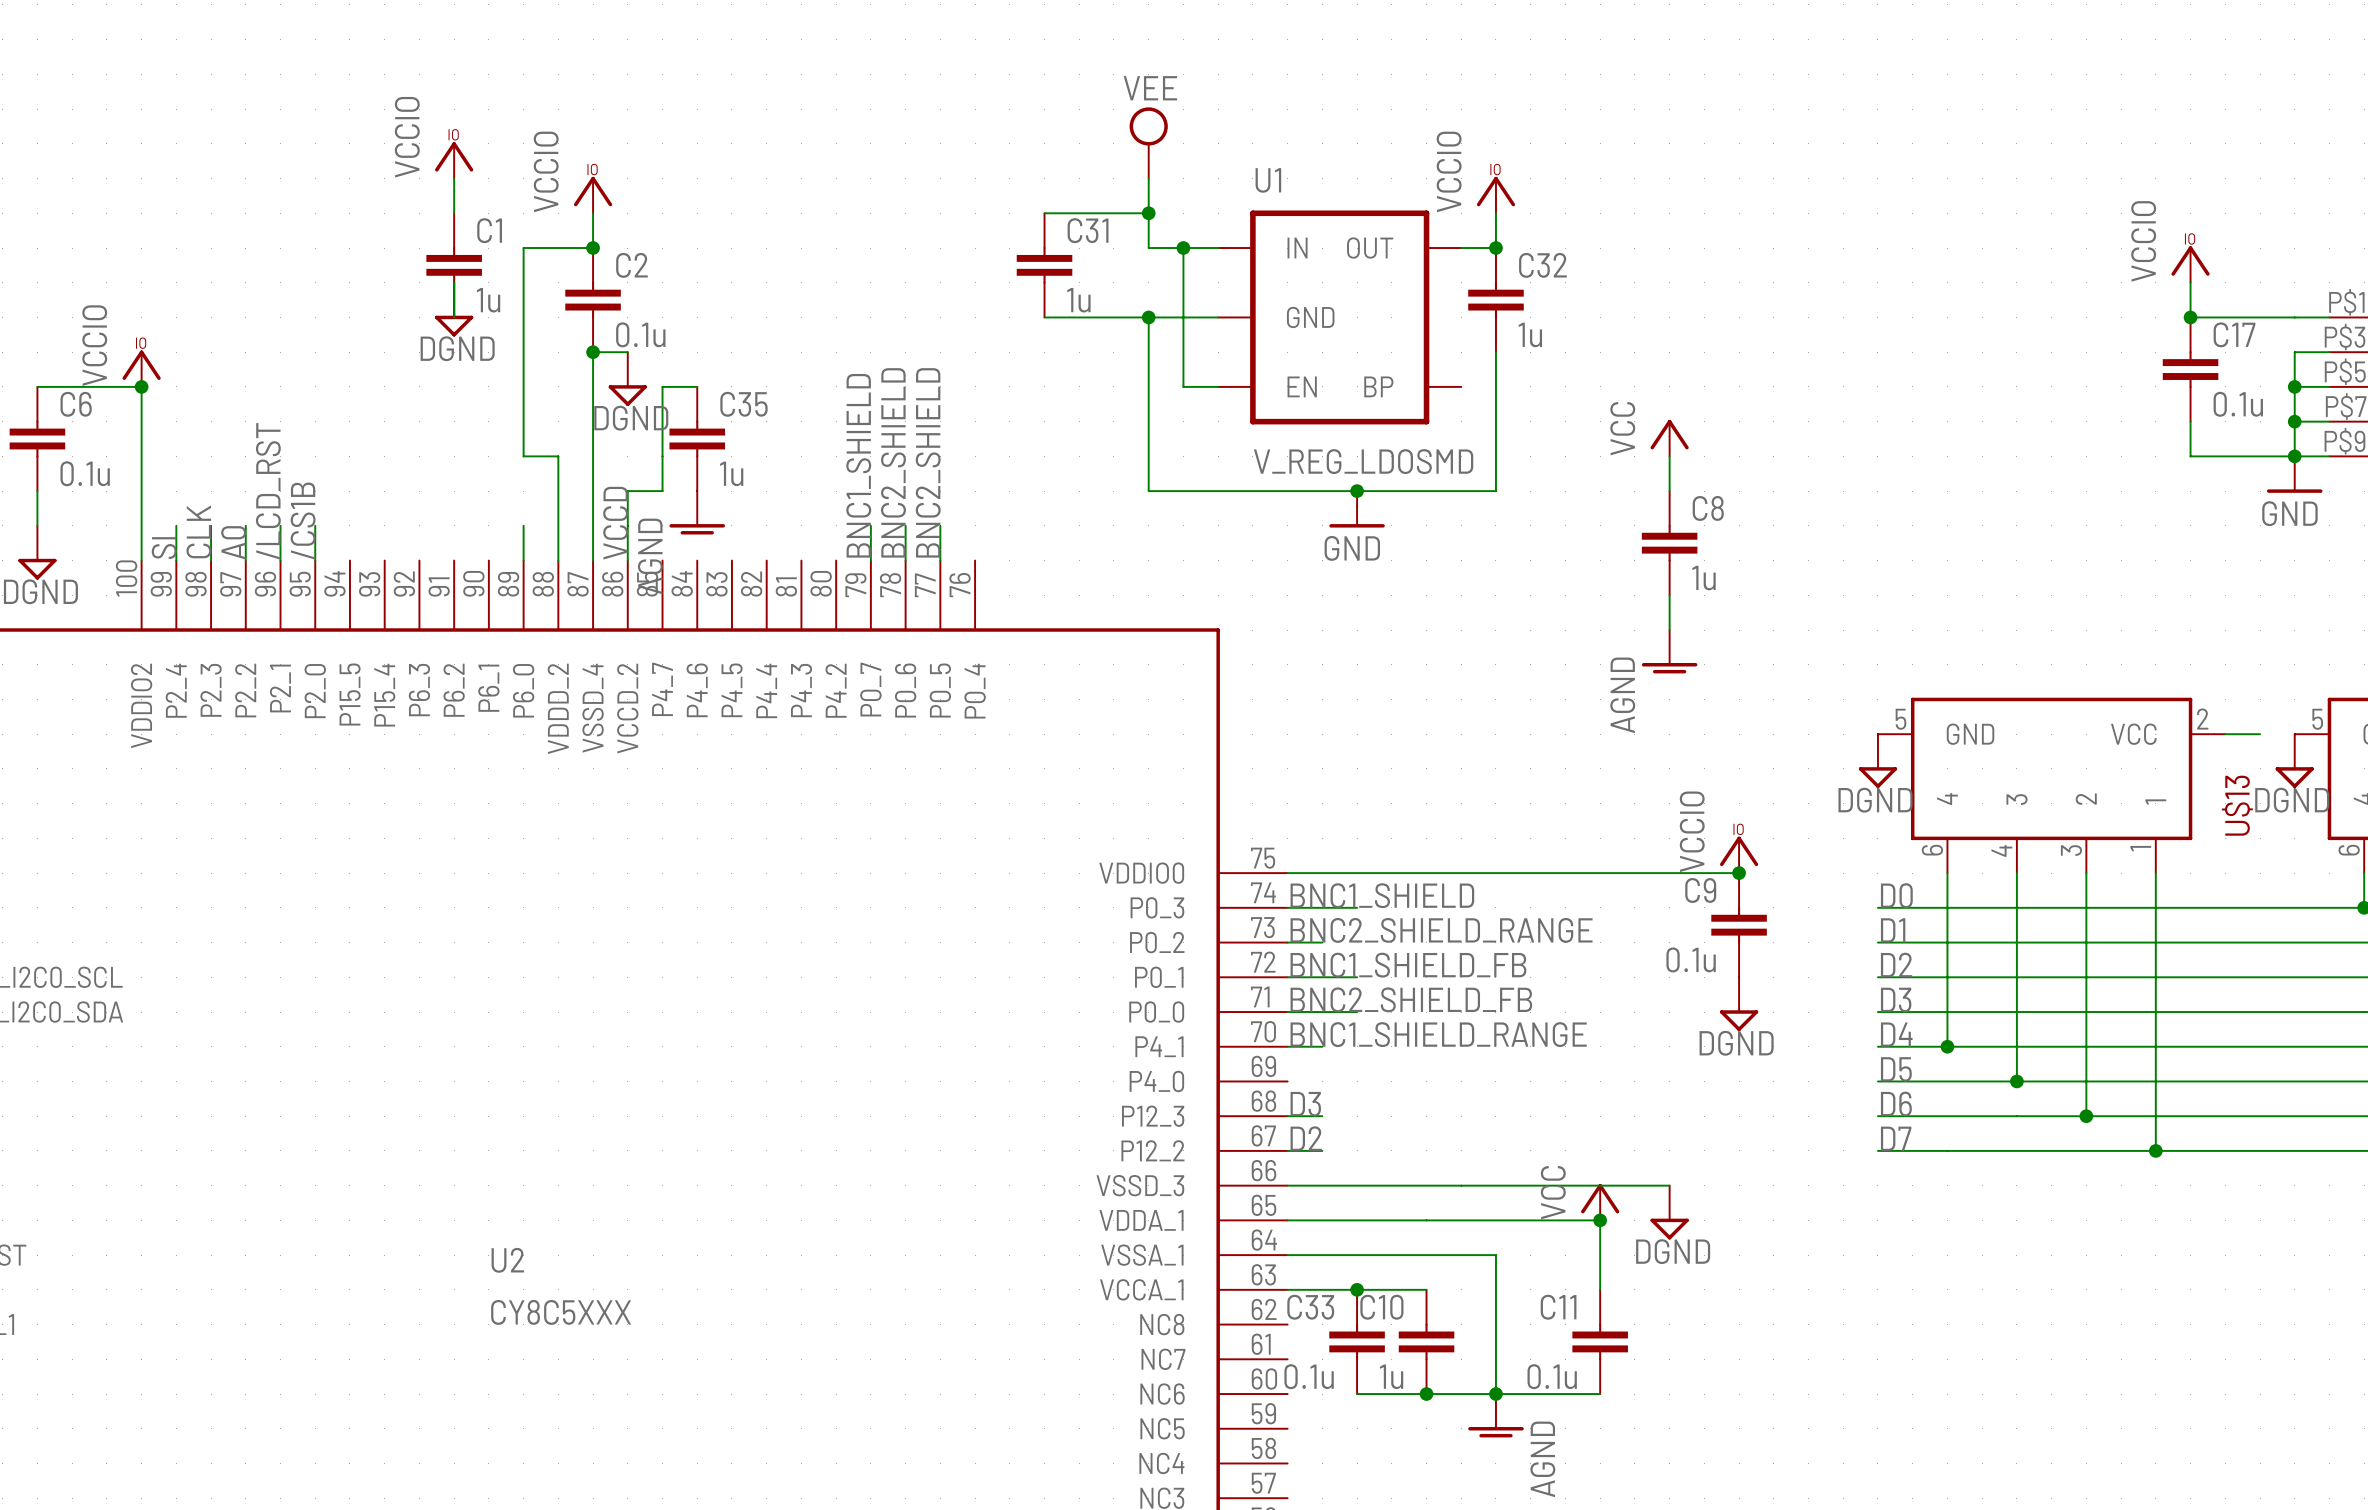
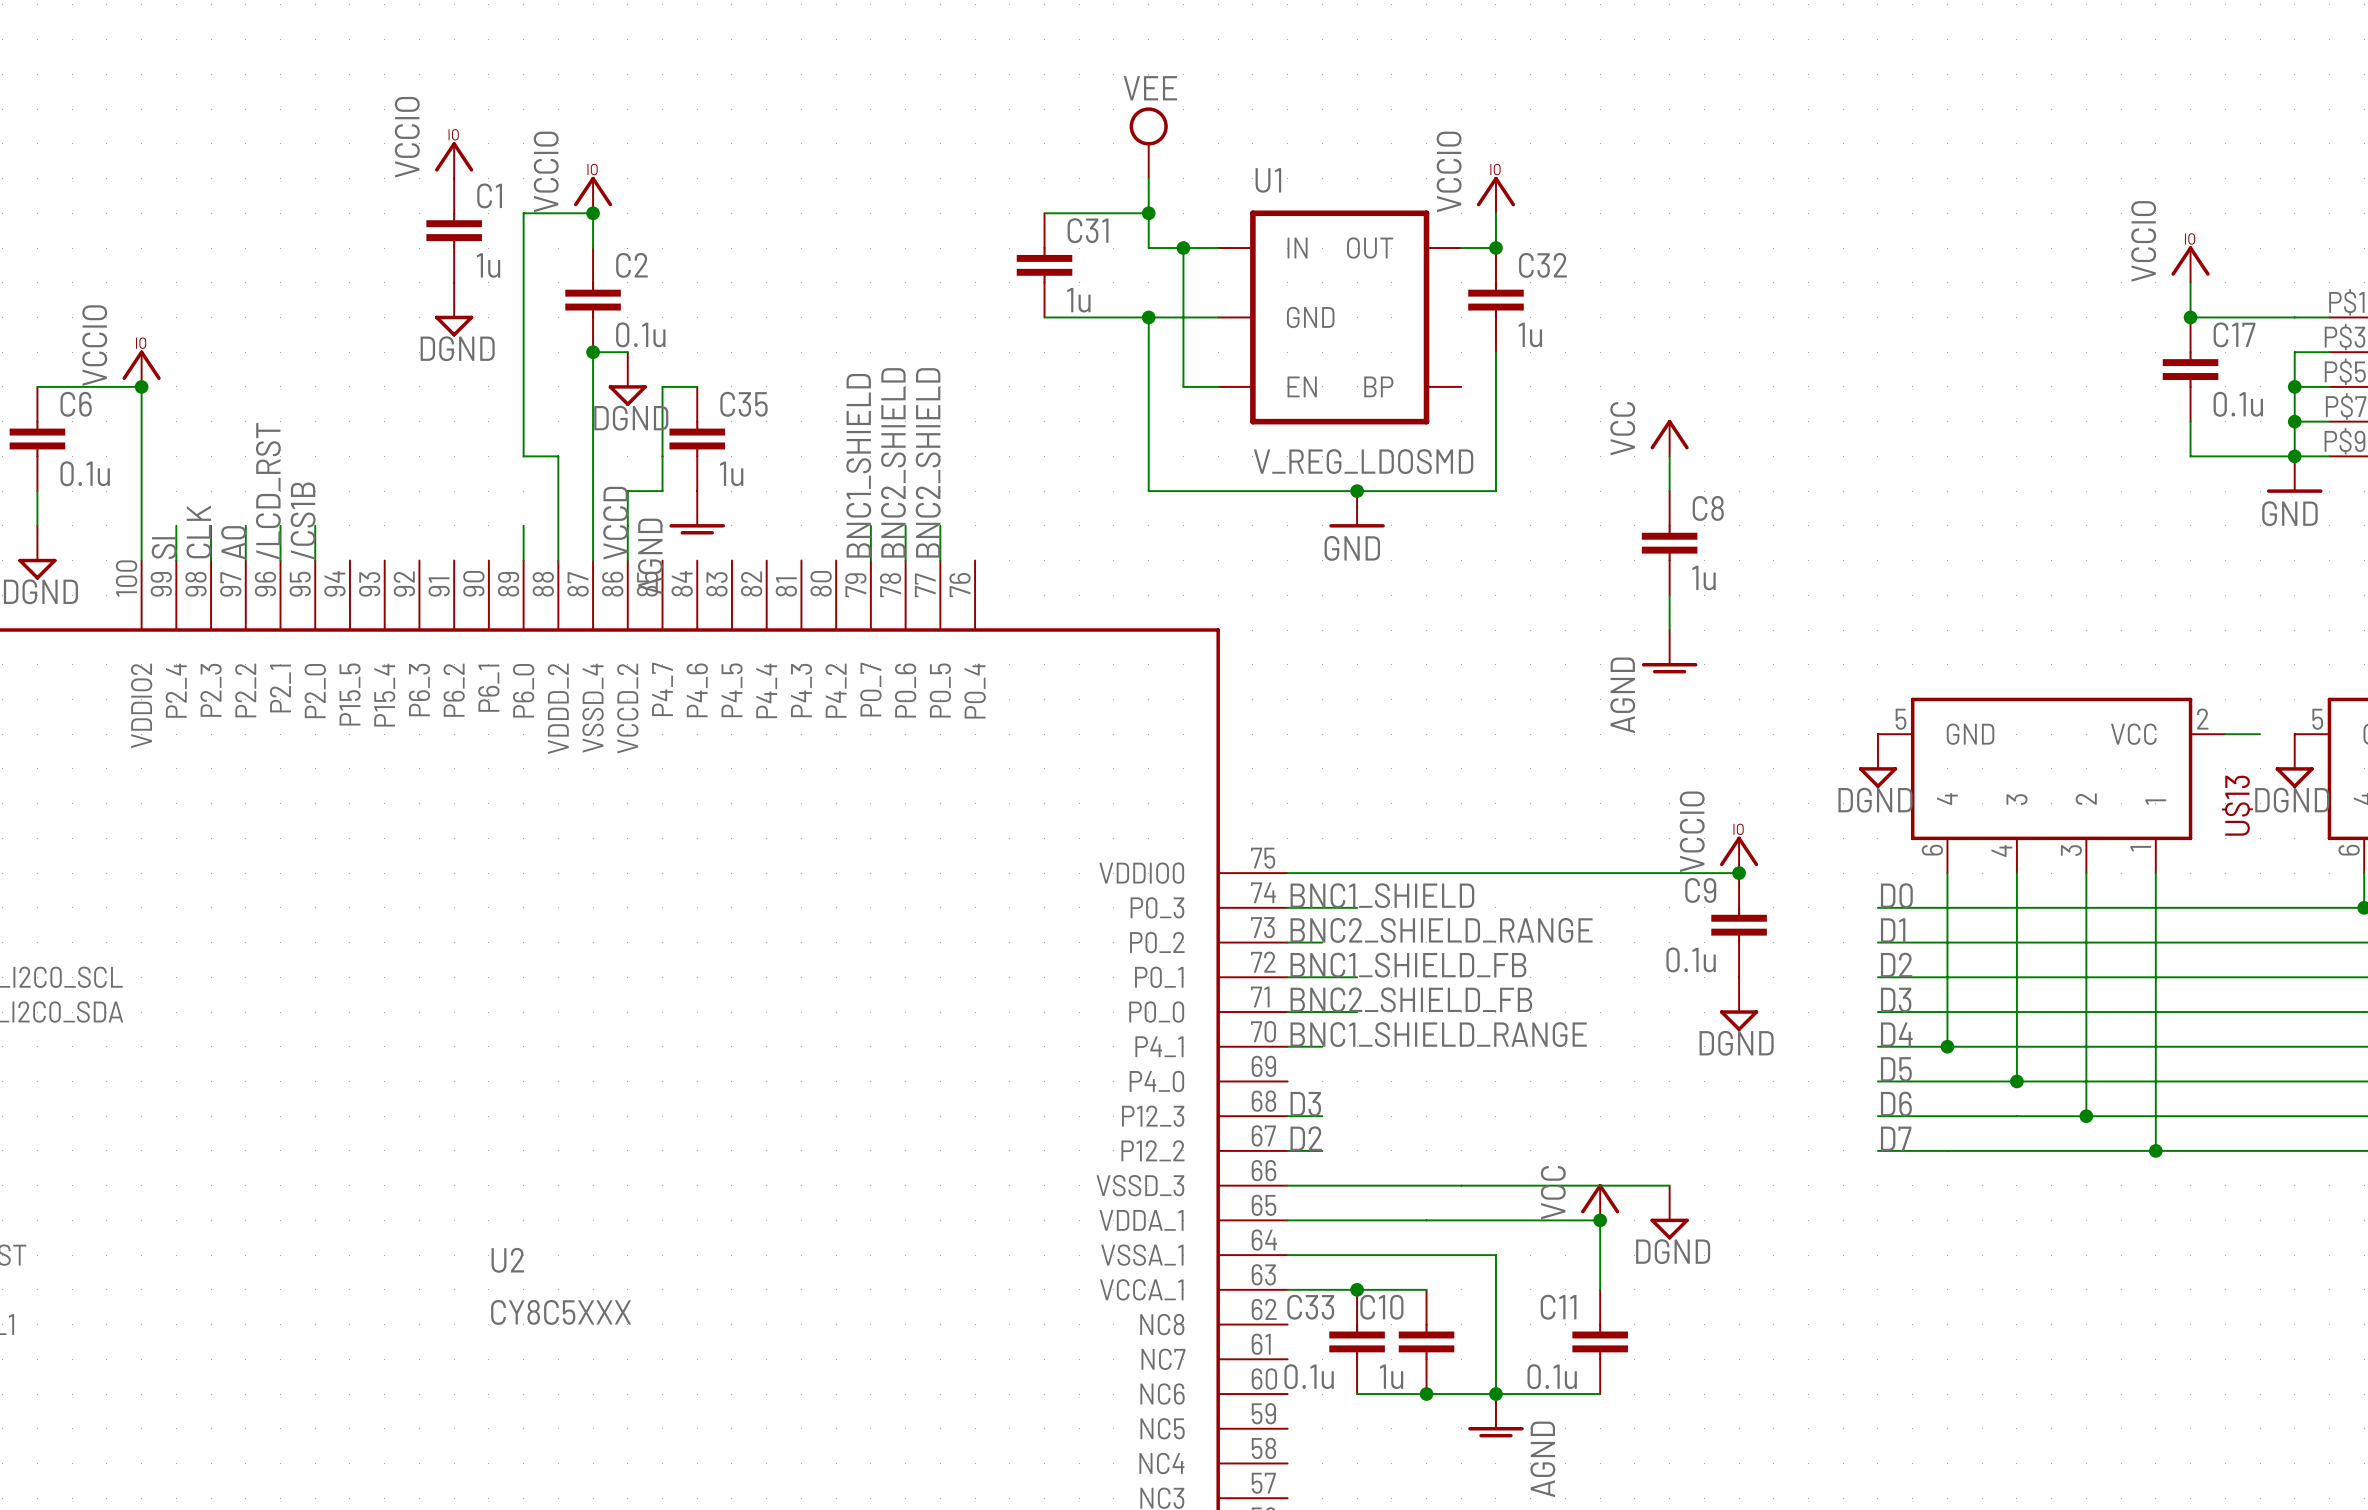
wire: (523, 248) (593, 248) -> (523, 248) (523, 213) (593, 213)
junction position: (593, 248) -> (593, 213)
C1 position: (454, 265) -> (454, 230)

